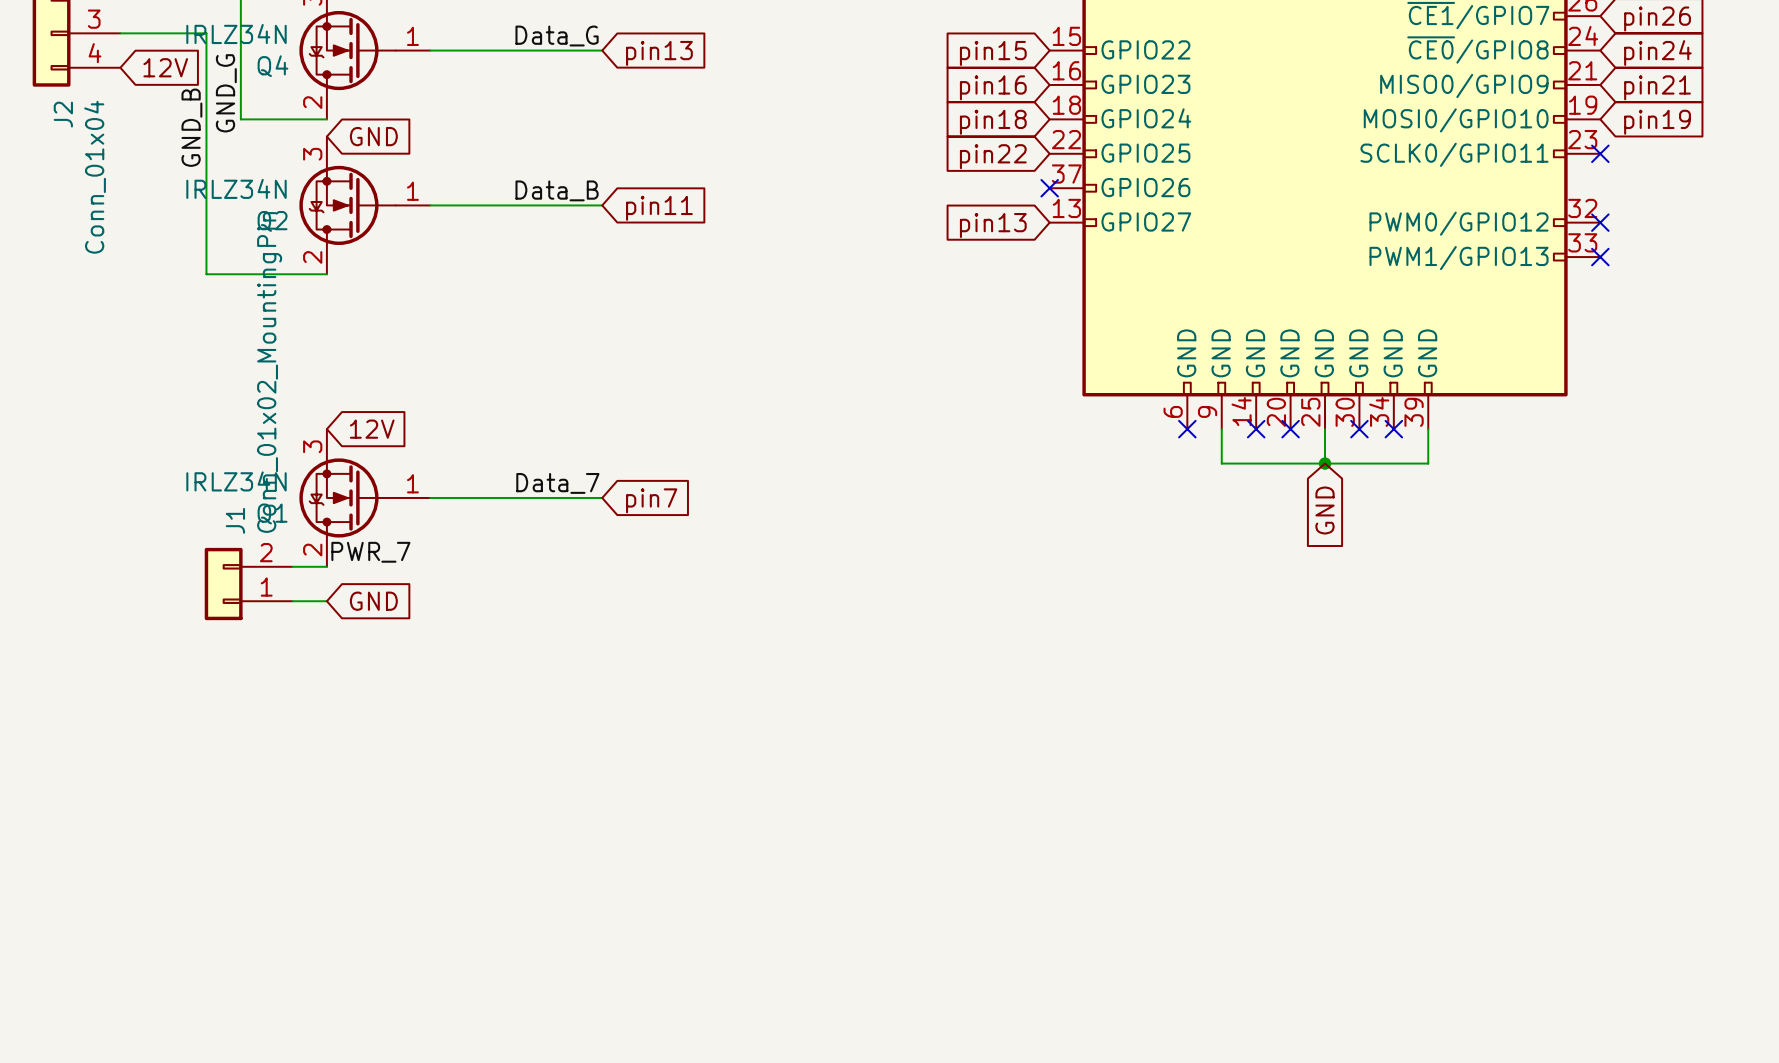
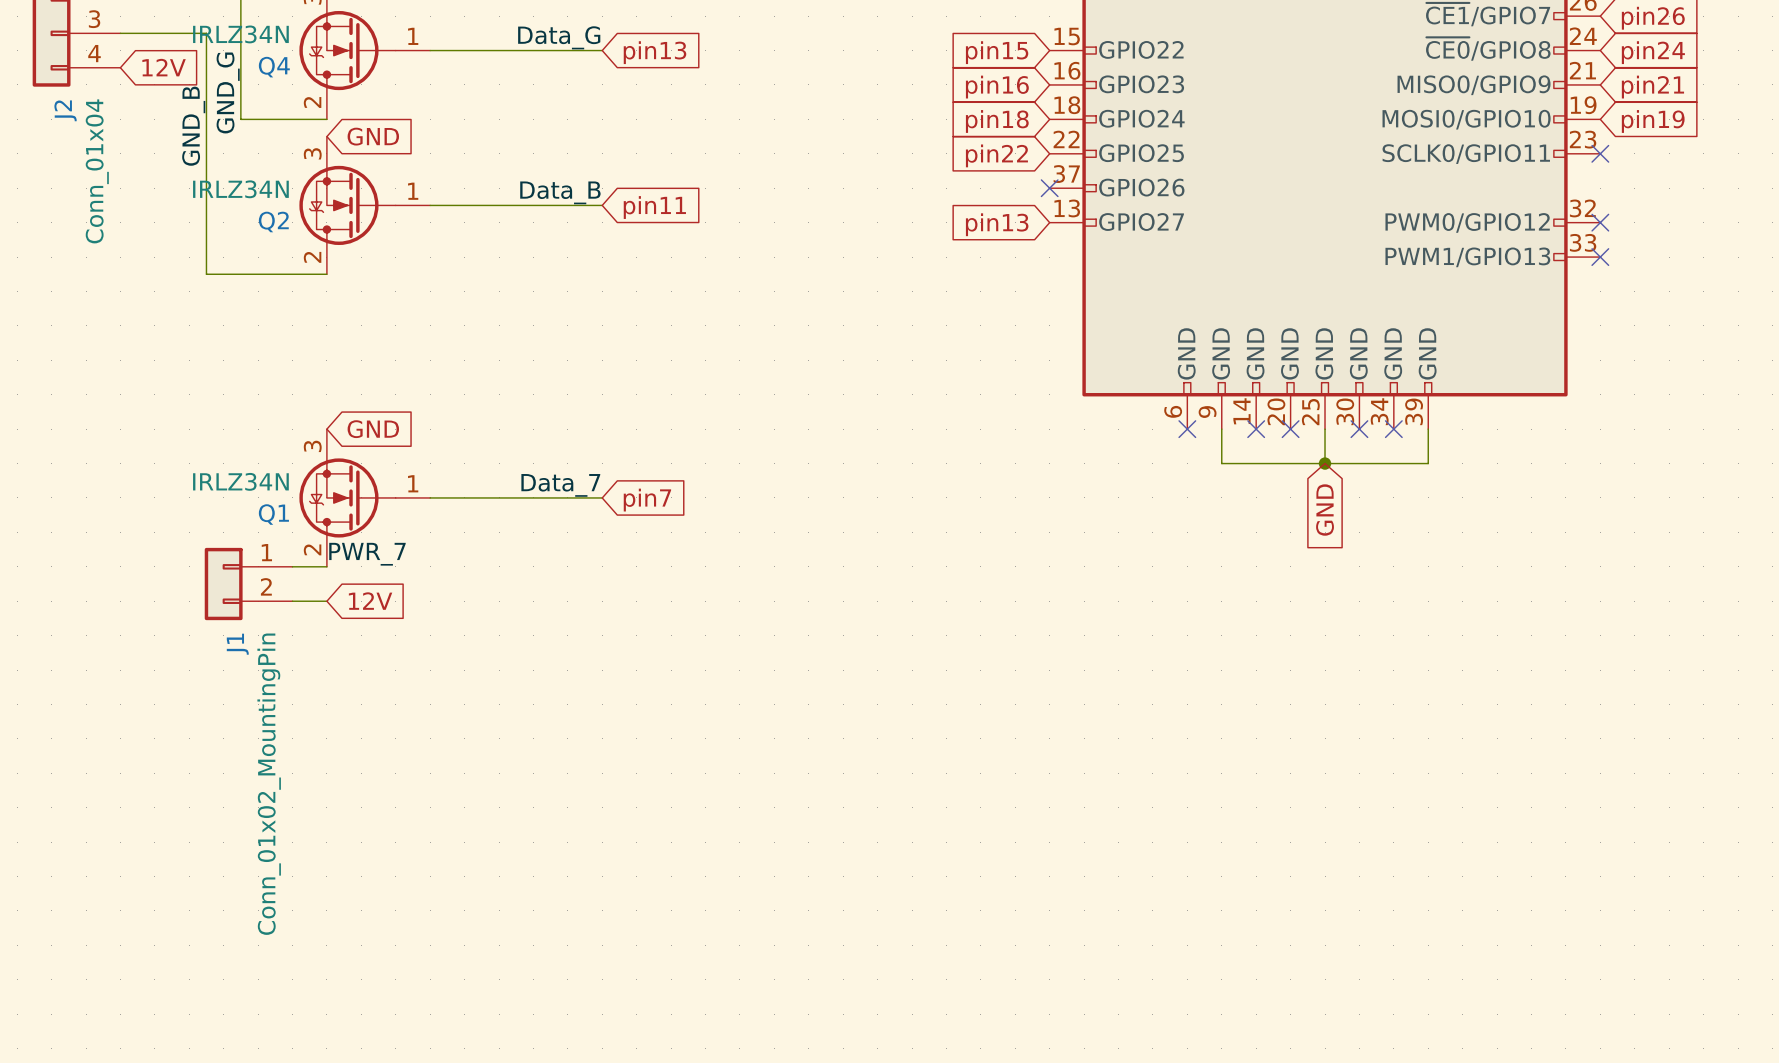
global label: 12V (372, 429) -> GND (373, 429)
J1 flip: as is (223, 584) -> up-down (223, 584)
global label: GND (373, 601) -> 12V (370, 601)

